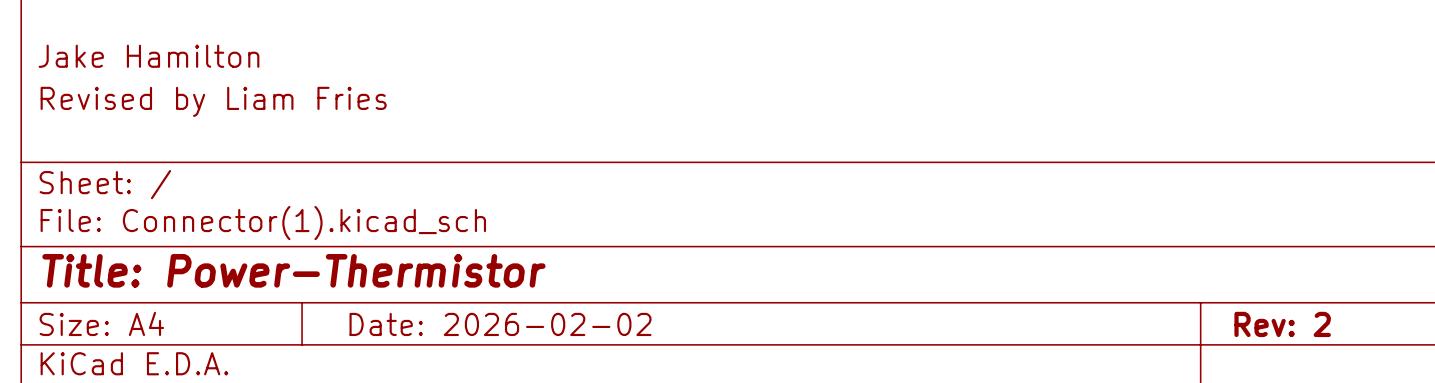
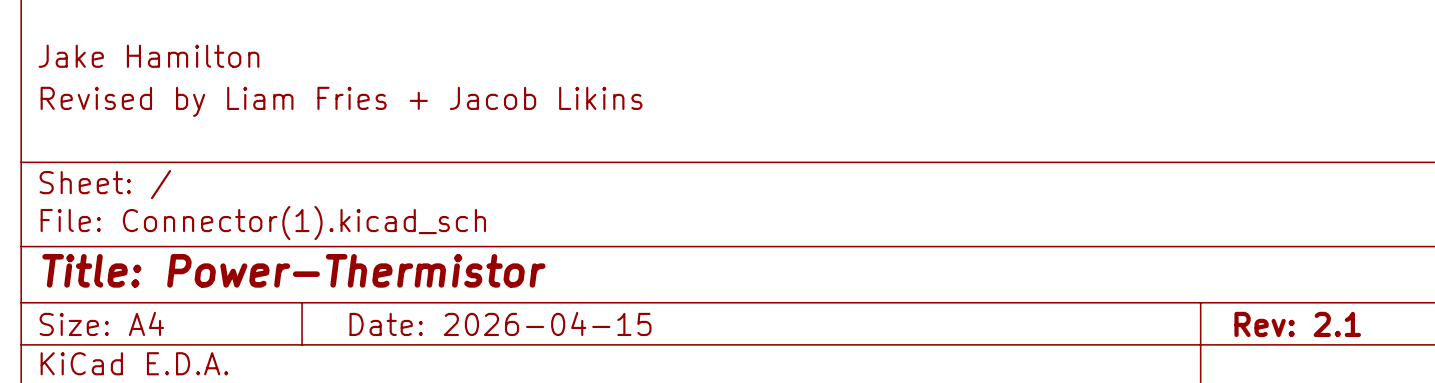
title block: Revised by Liam Fries (213, 101) -> Revised by Liam Fries + Jacob Likins (341, 101)
title block: Date: 2026-02-02 (500, 324) -> Date: 2026-04-15 (500, 323)
title block: Rev: 2 (1282, 324) -> Rev: 2.1 (1297, 324)

